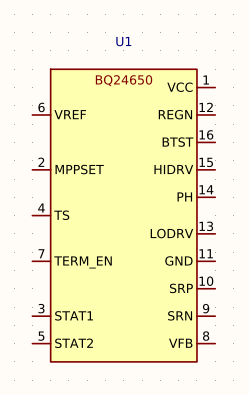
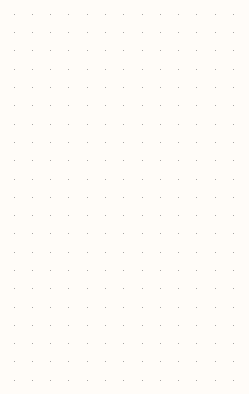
U1: (123, 215) -> none

